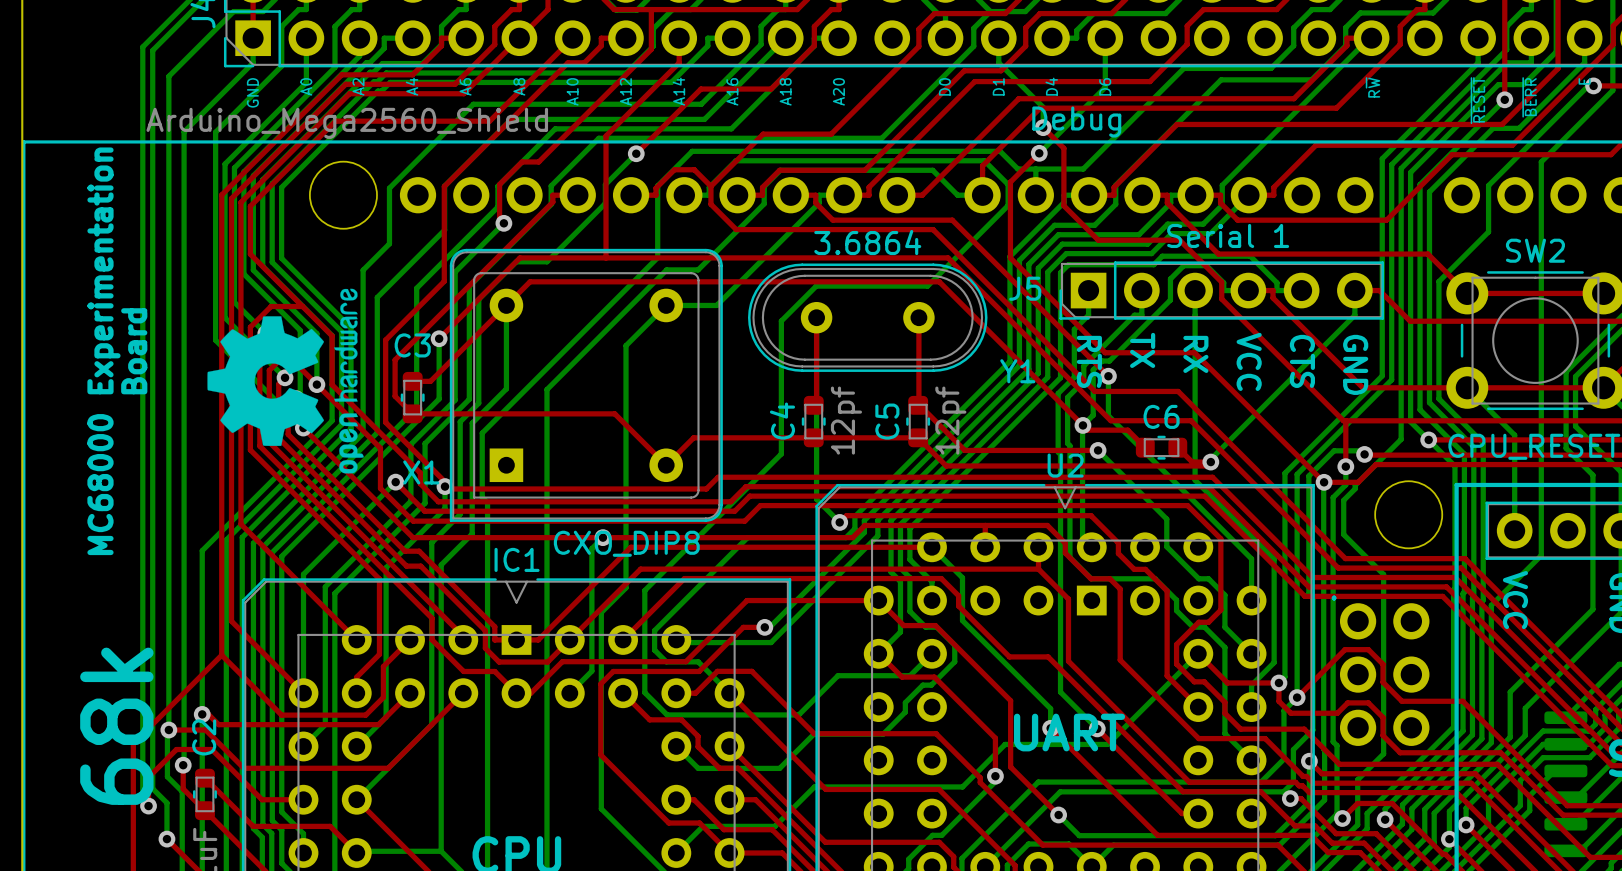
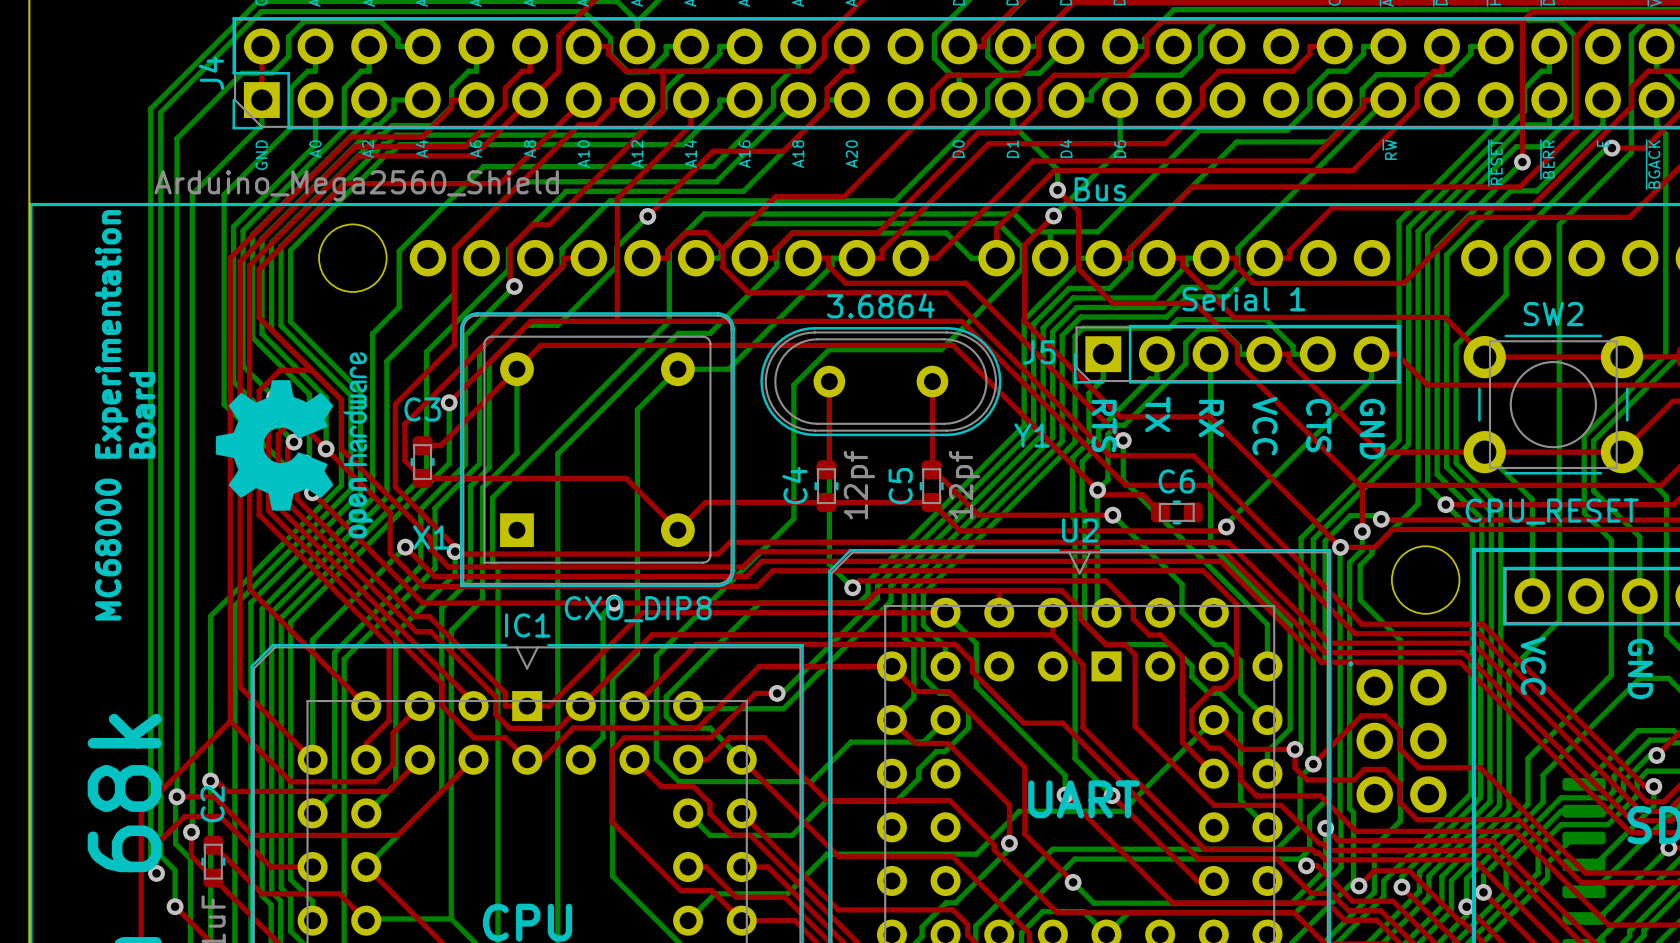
J4 value: Debug (1076, 122) -> Bus (1100, 189)
top track: (1177, 447) (1192, 462) (1210, 462) -> none

